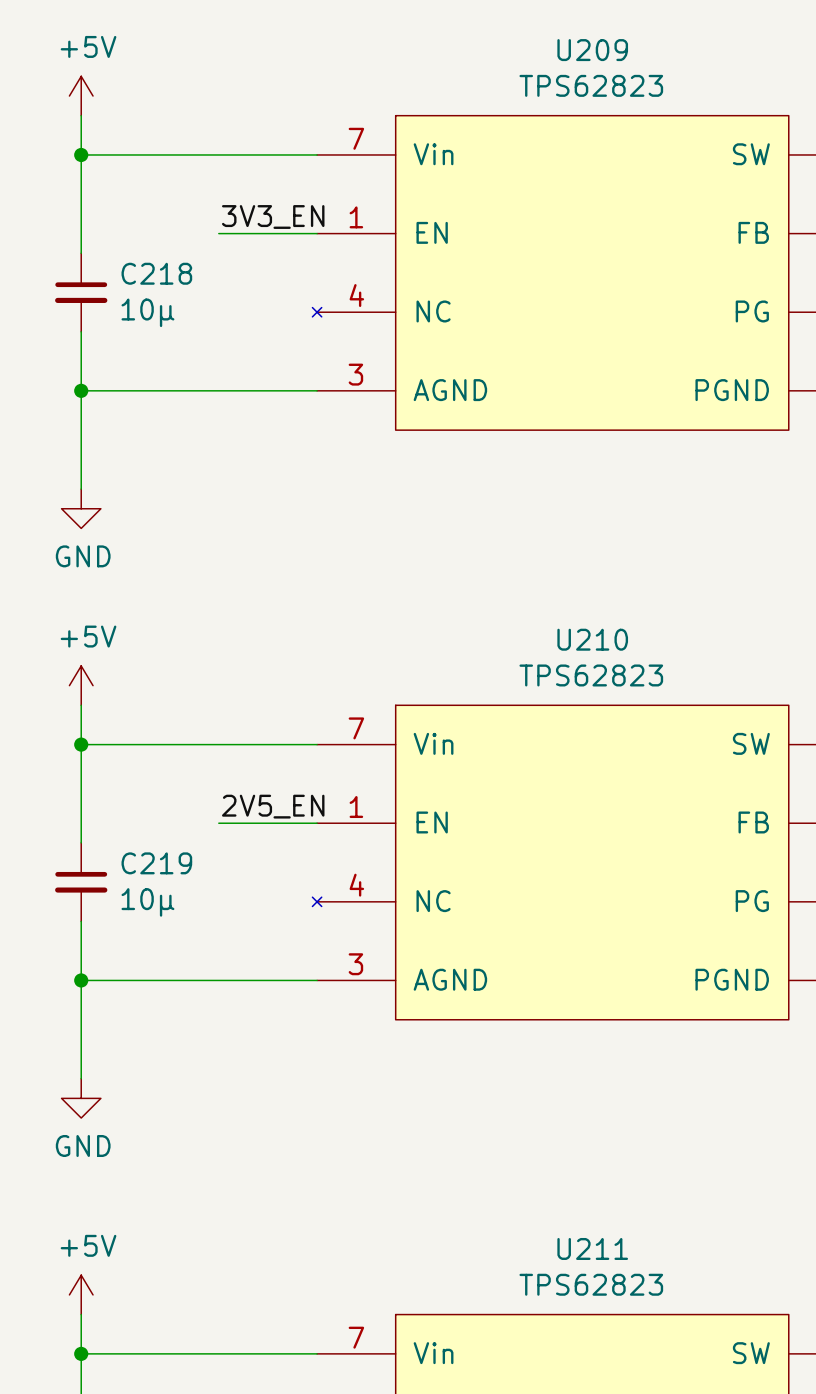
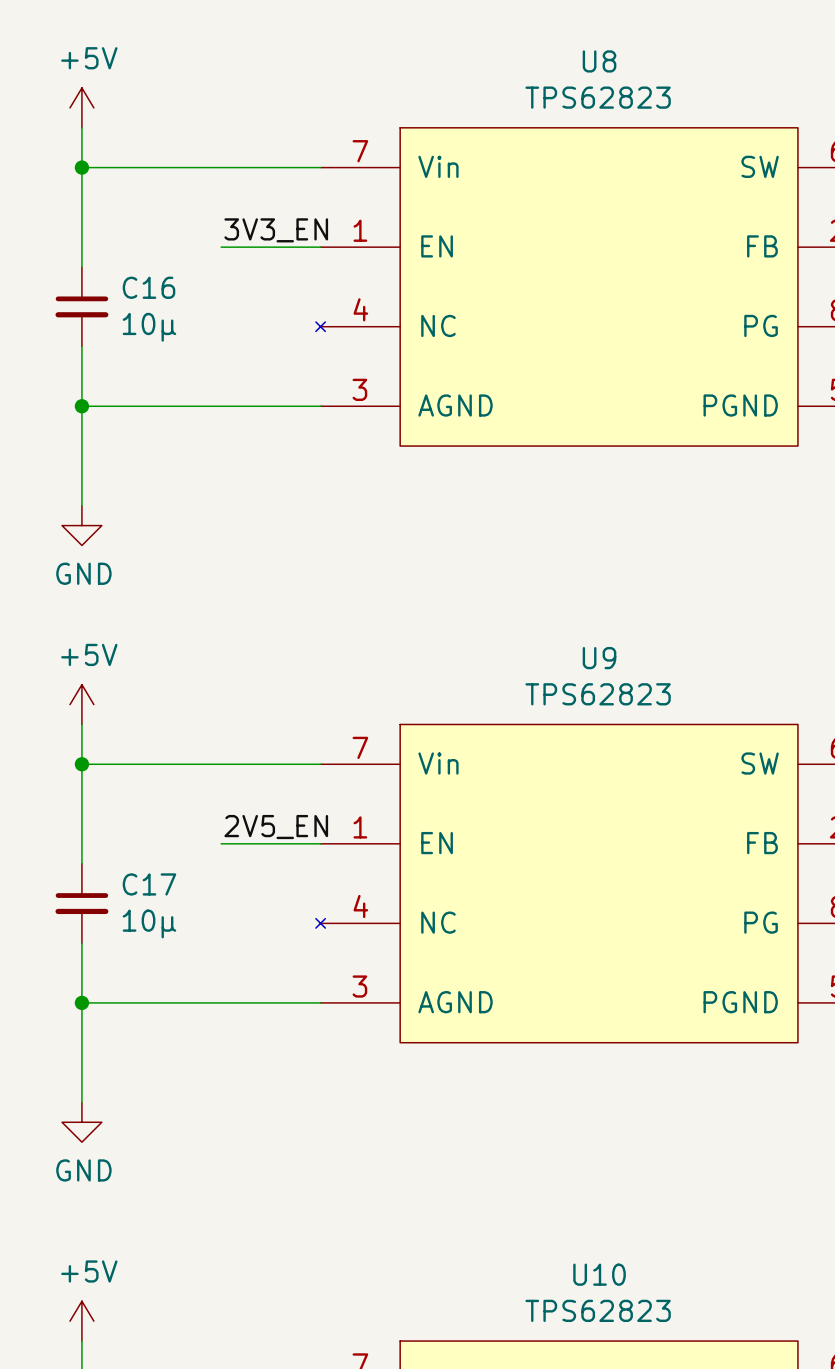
U209 name: U209 (592, 50) -> U8 (599, 61)
C218 name: C218 (156, 273) -> C16 (148, 287)
U210 name: U210 (592, 639) -> U9 (599, 658)
C219 name: C219 (156, 863) -> C17 (149, 884)
U211 name: U211 (592, 1248) -> U10 (599, 1274)

